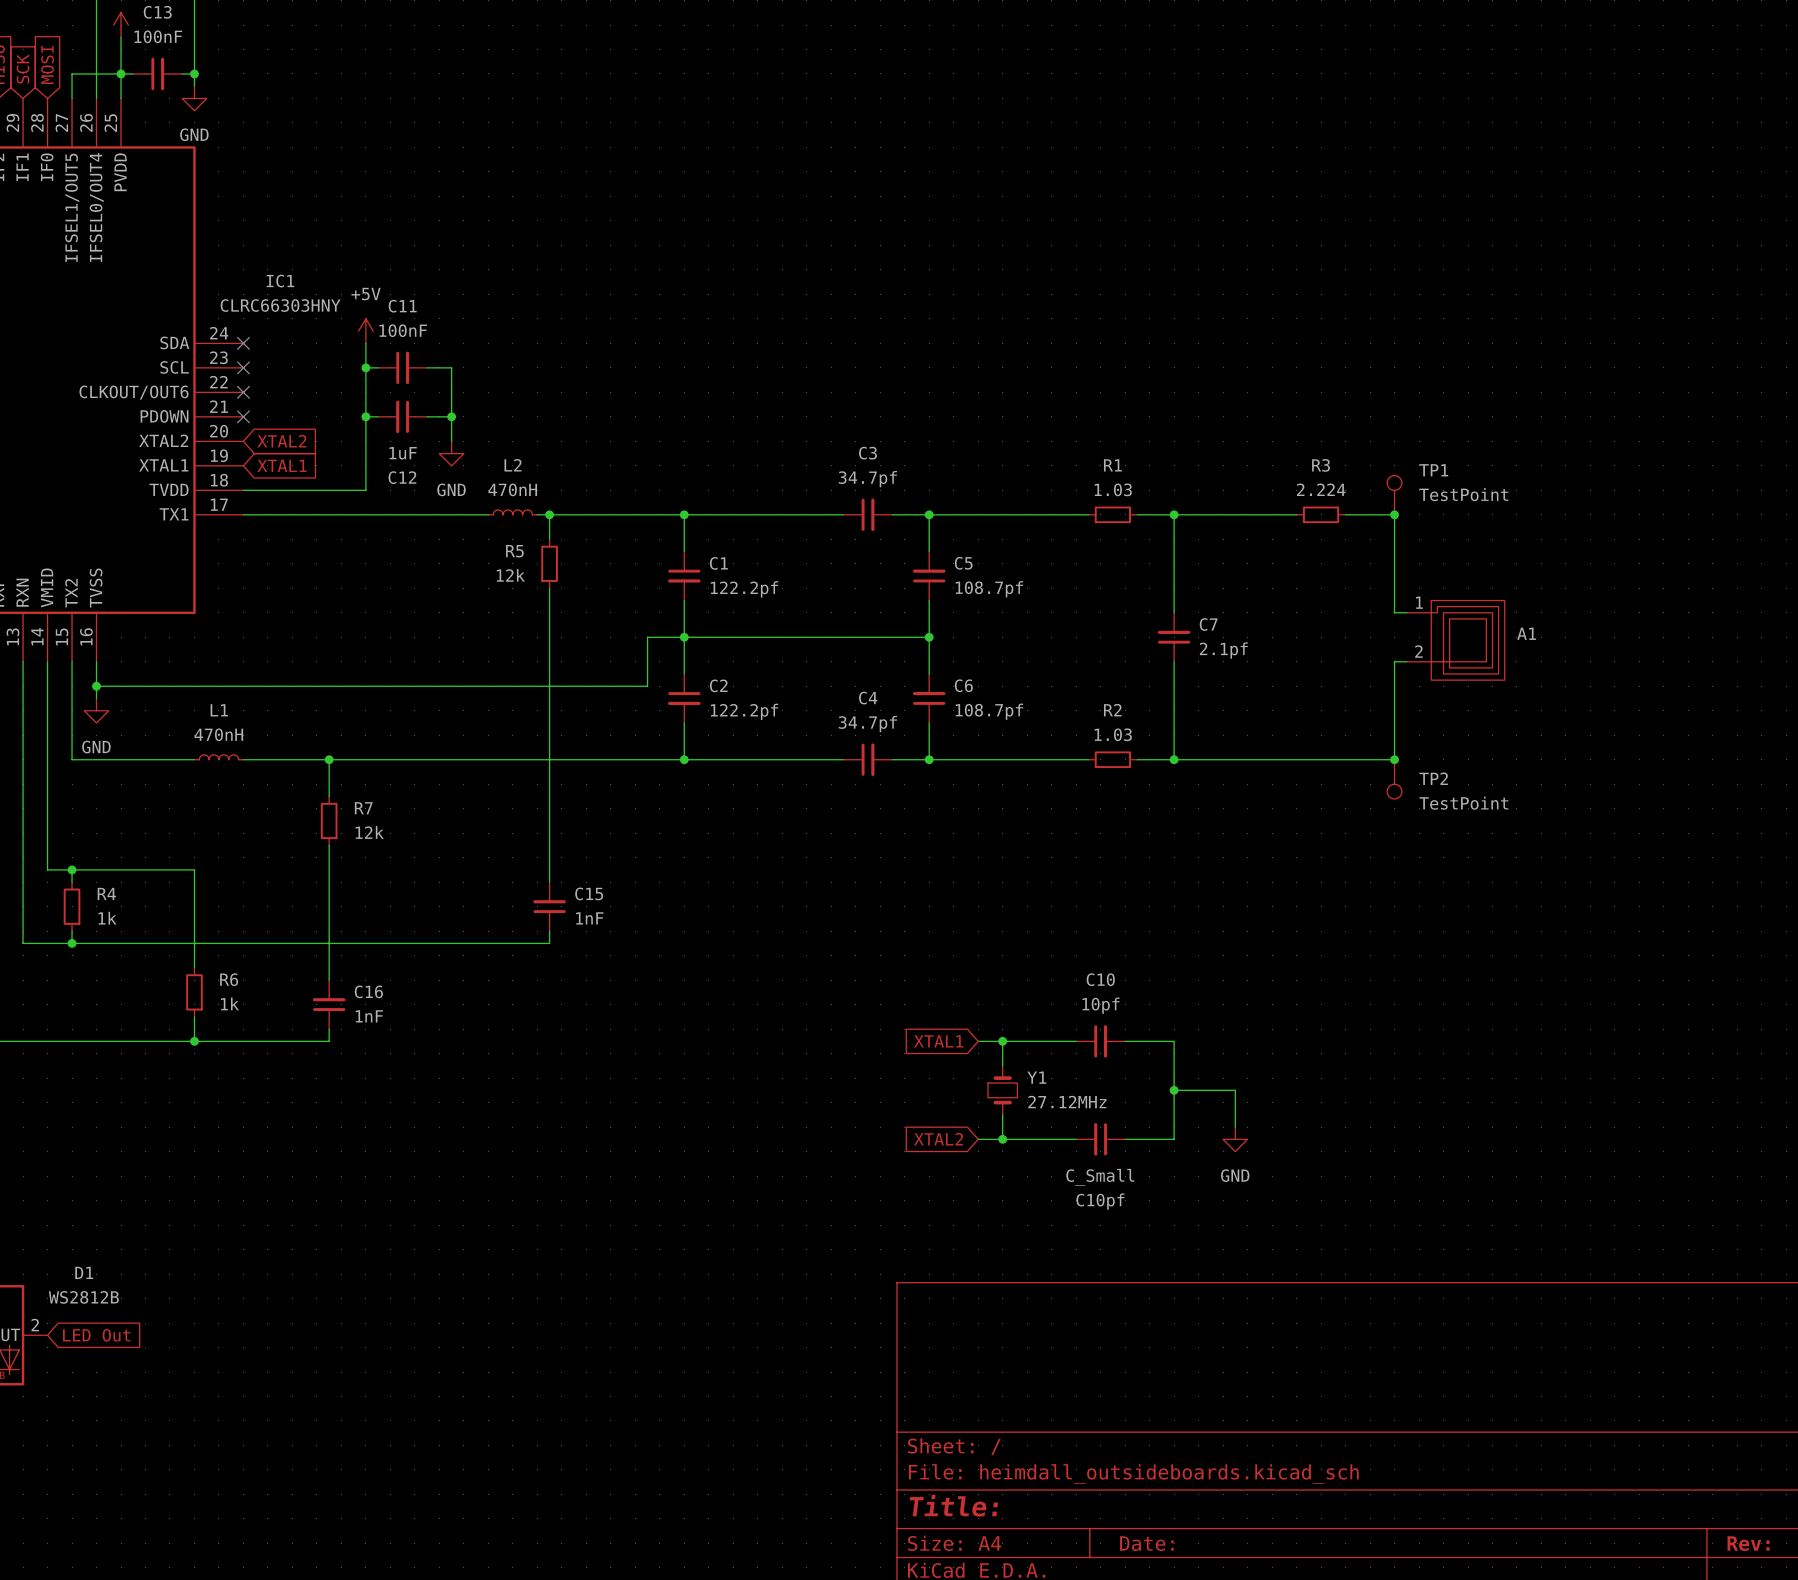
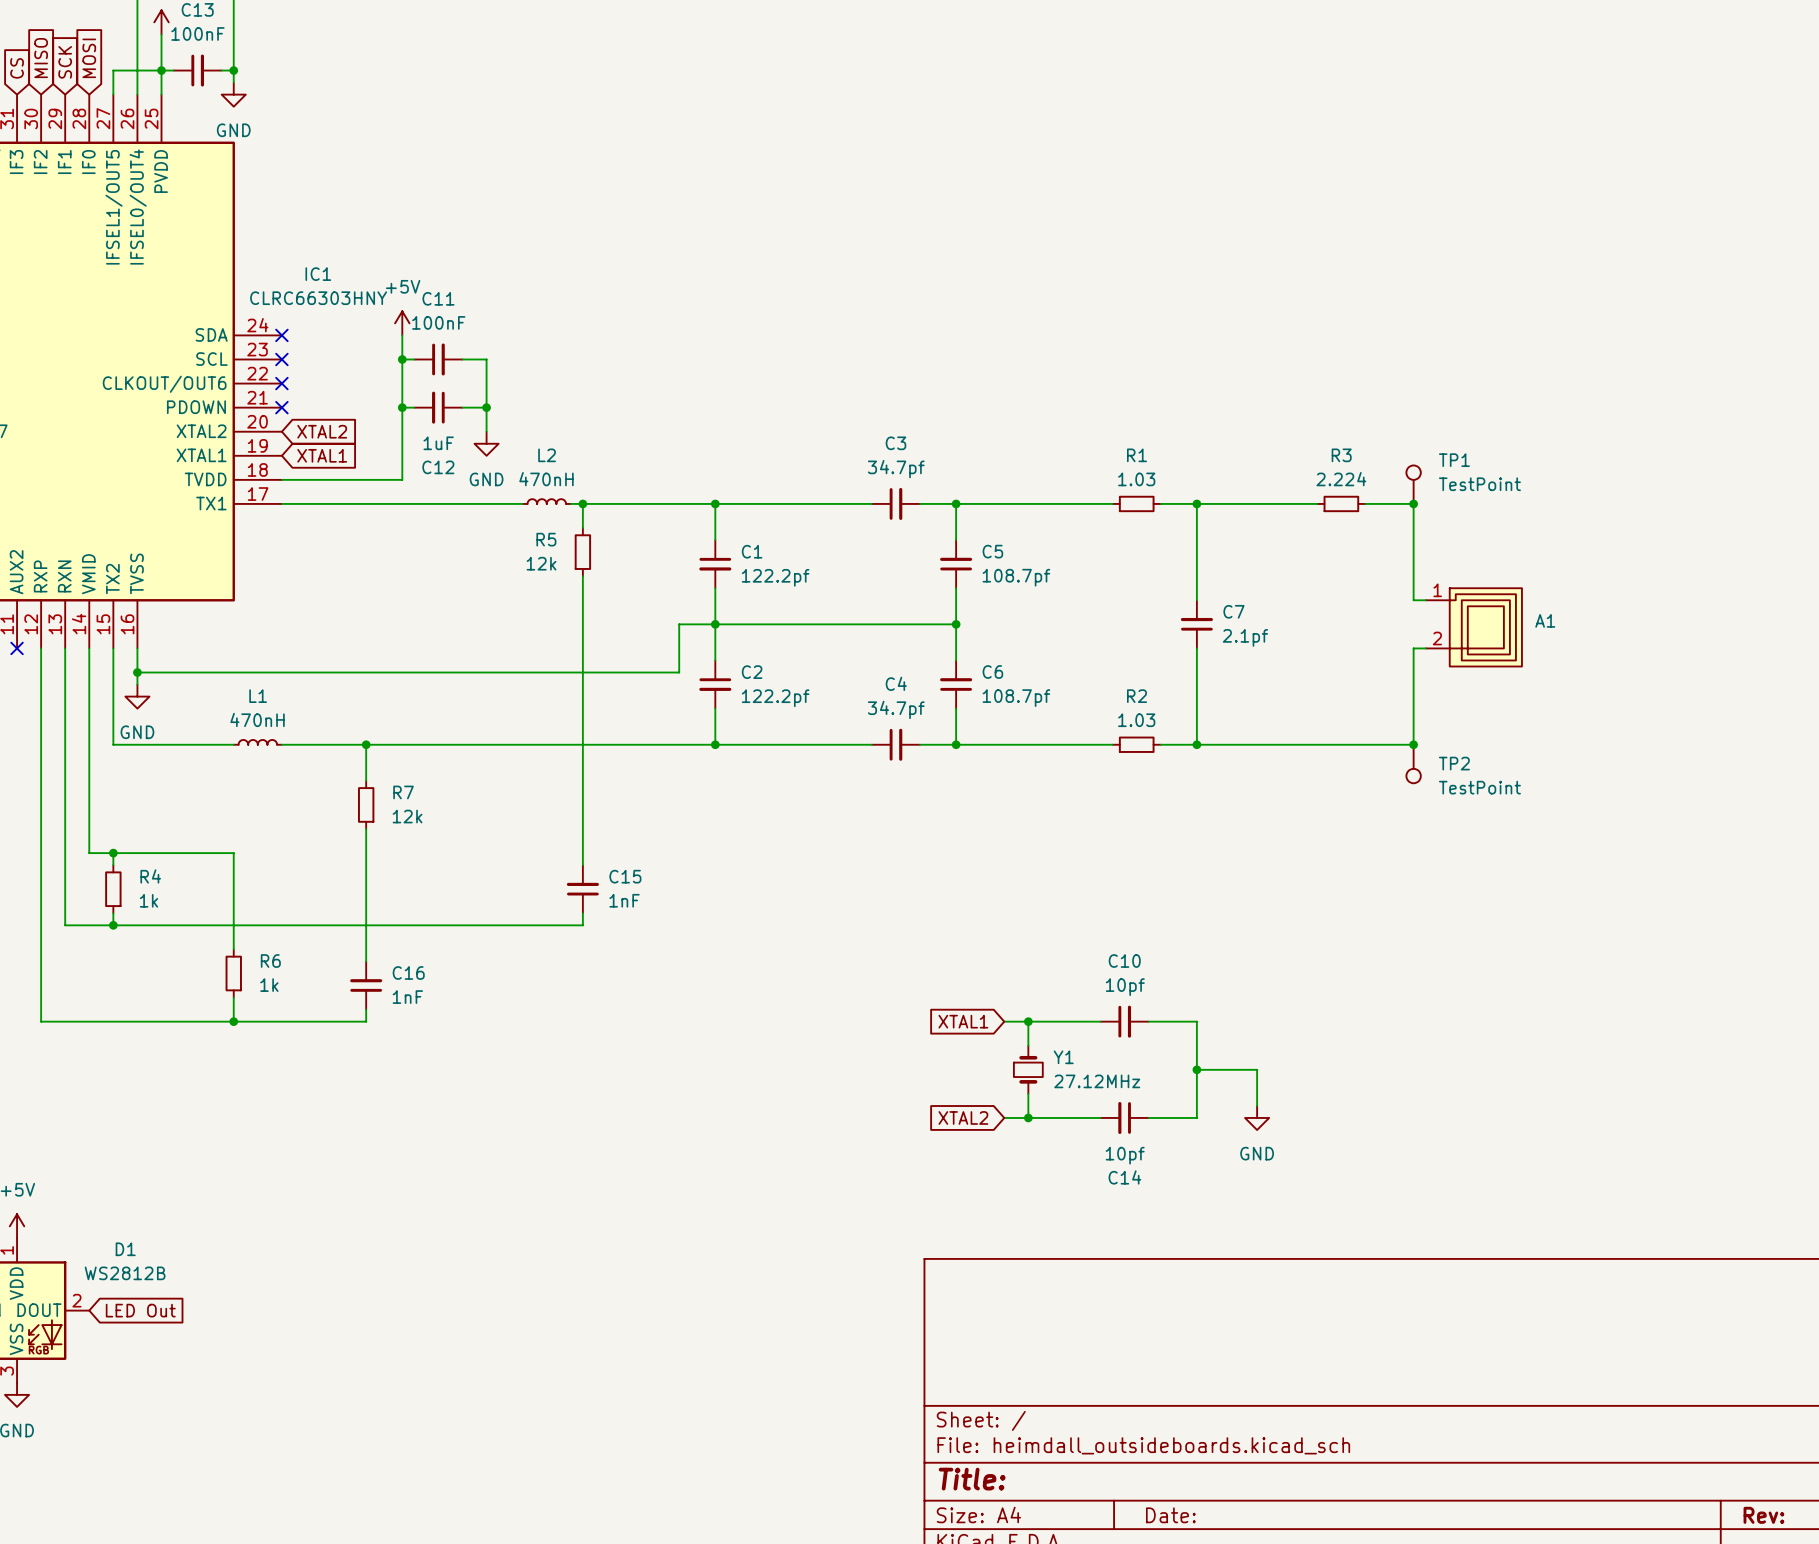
C10pf value: C_Small (1100, 1177) -> 10pf (1125, 1155)
C10pf name: C10pf (1100, 1201) -> C14 (1124, 1177)

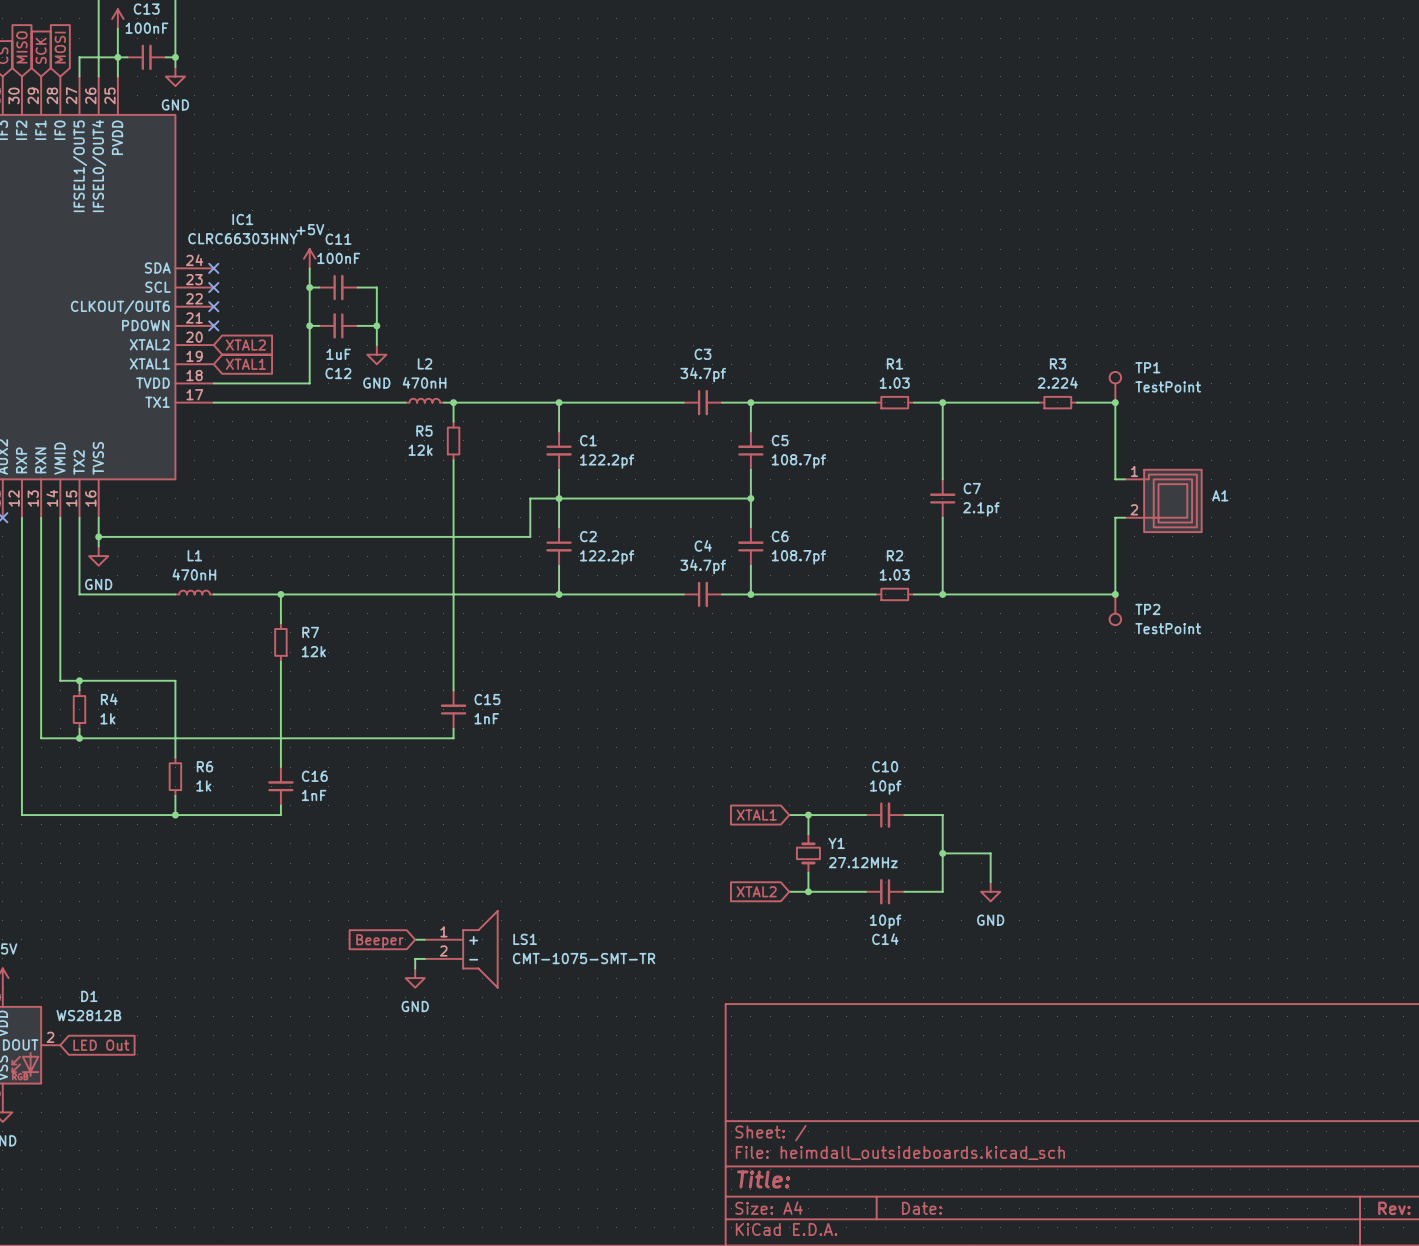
wire: none -> (415, 939) (424, 939)
global label: none -> Beeper (379, 941)
LS1: none -> CMT-1075-SMT-TR (461, 949)
wire: none -> (424, 958) (415, 958) (415, 968)
power symbol: none -> GND (415, 978)

